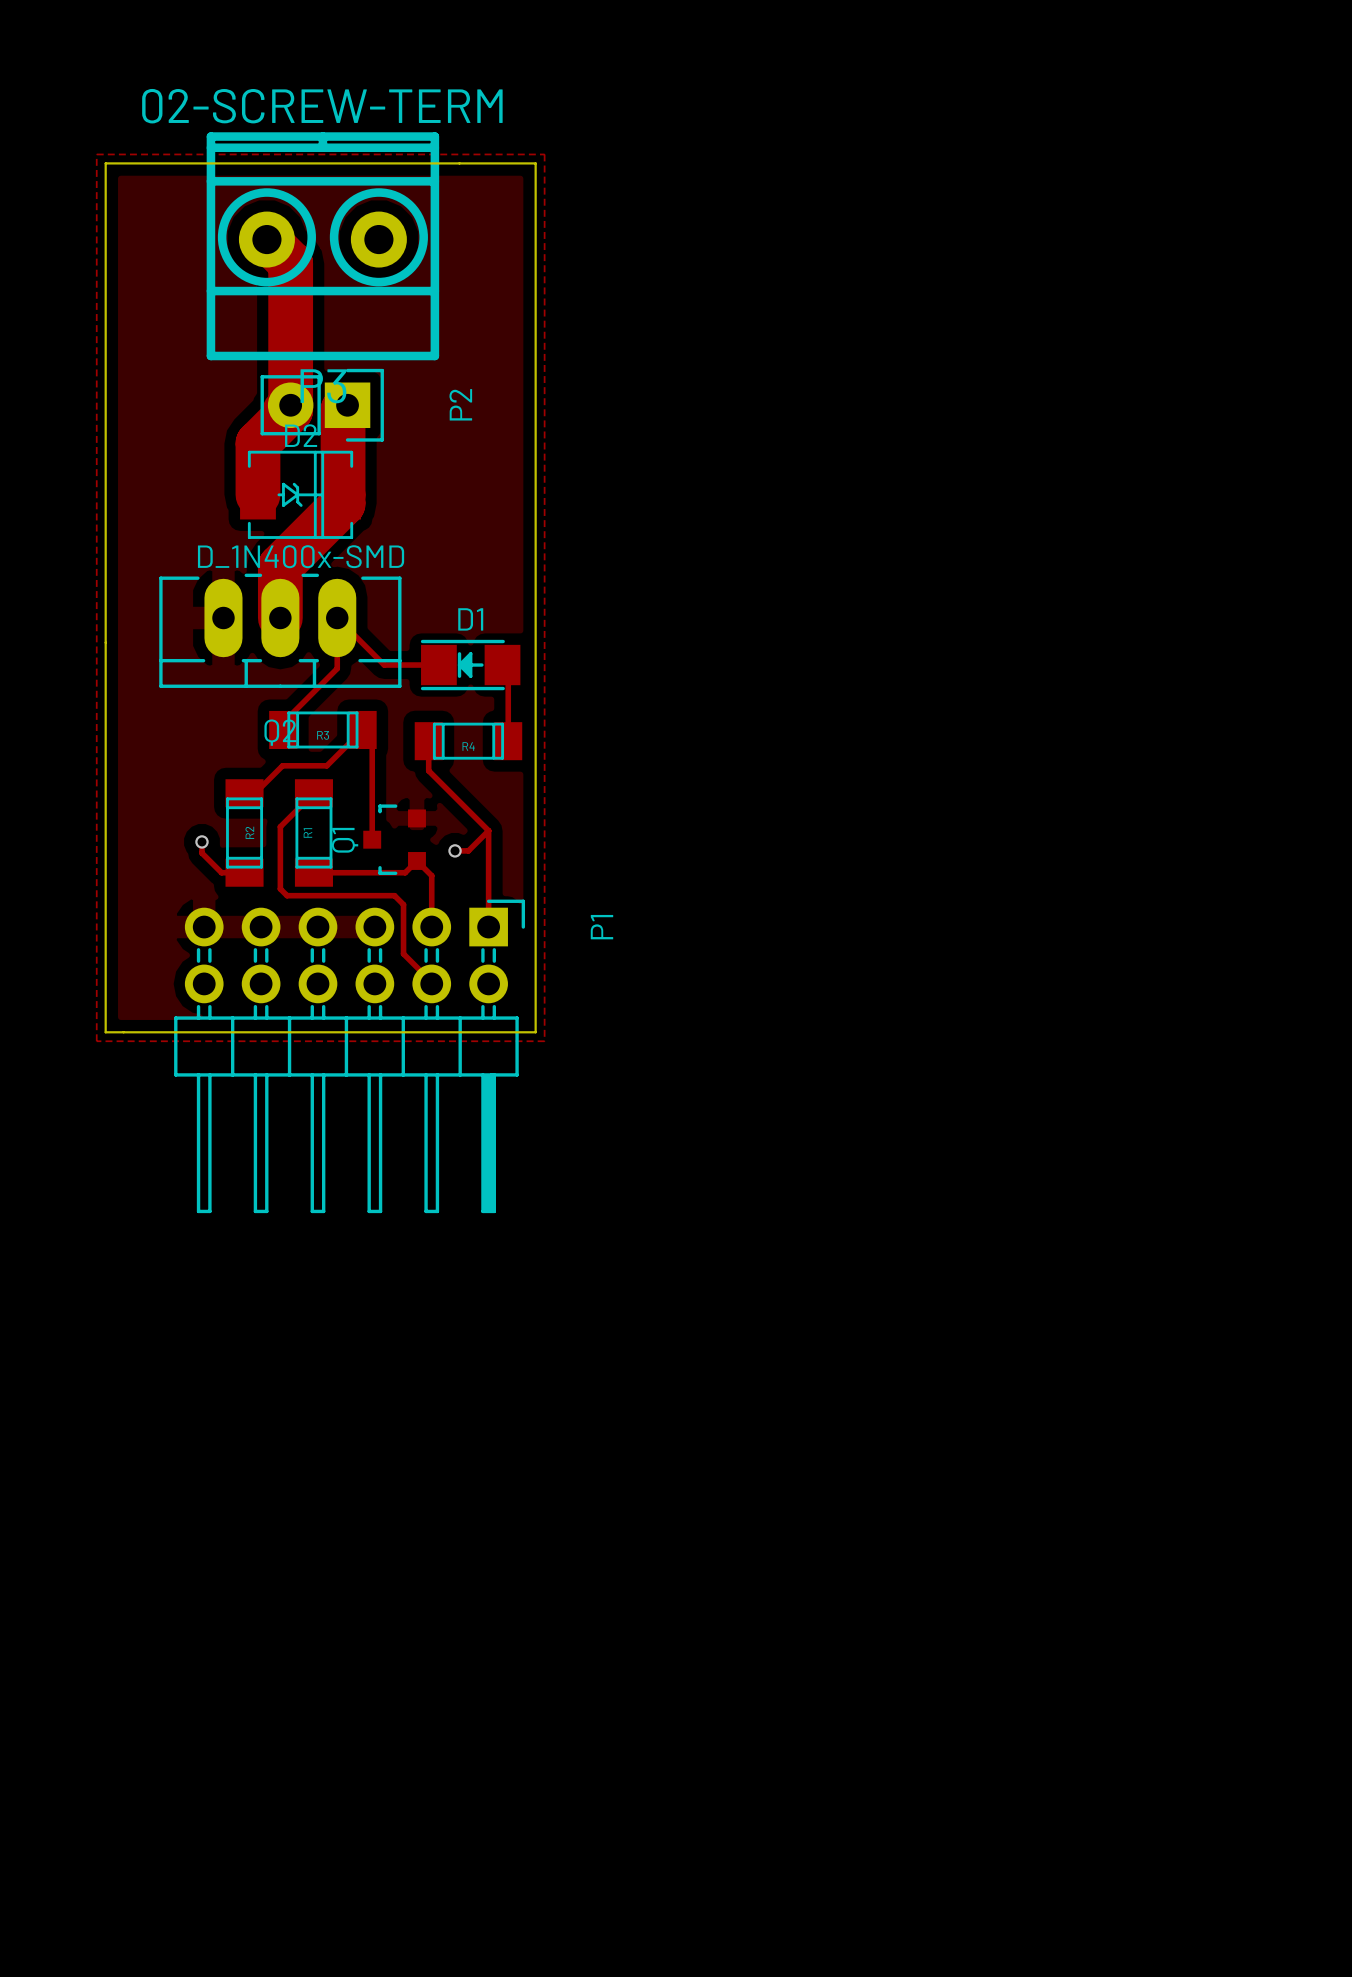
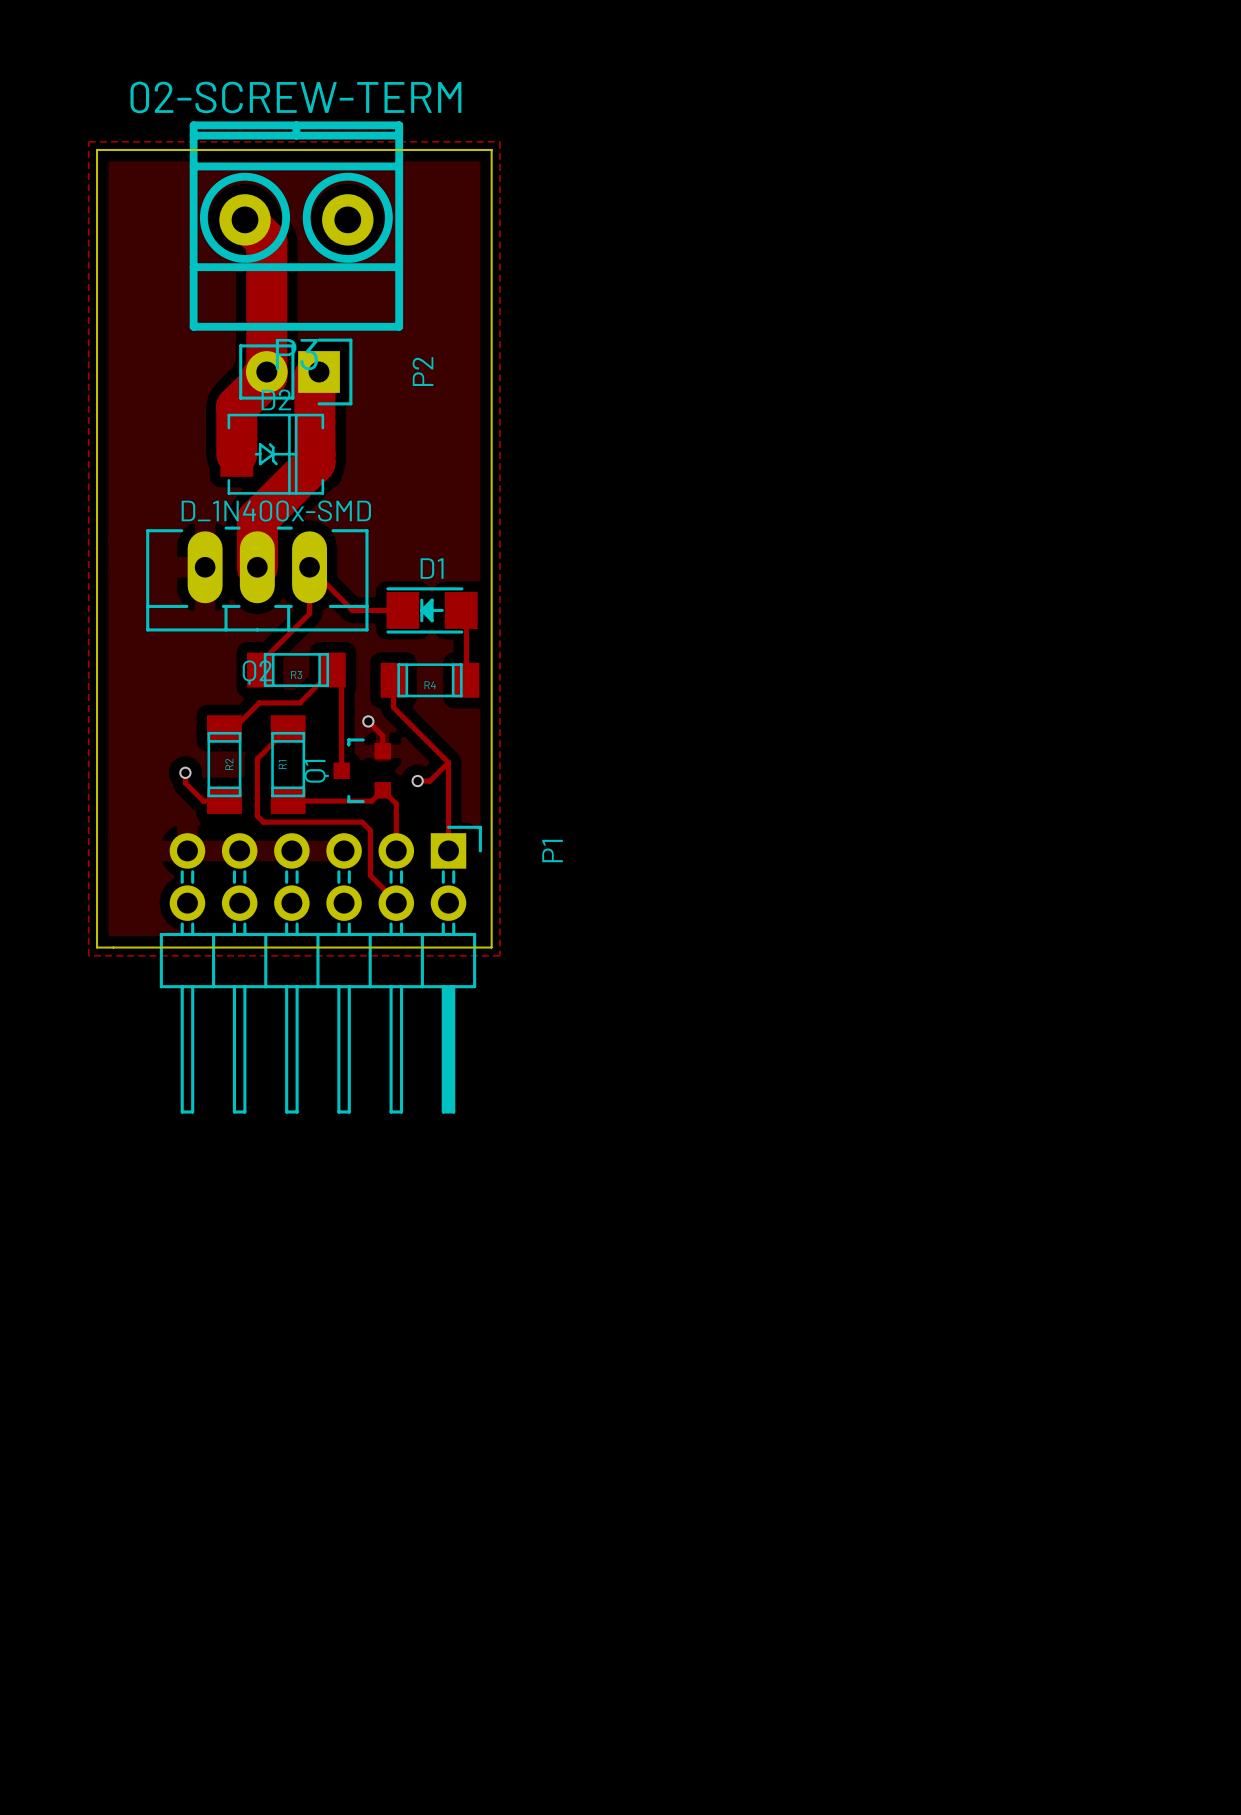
track: none -> (368, 721) (382, 735) (382, 751)
via: none -> (368, 721)

